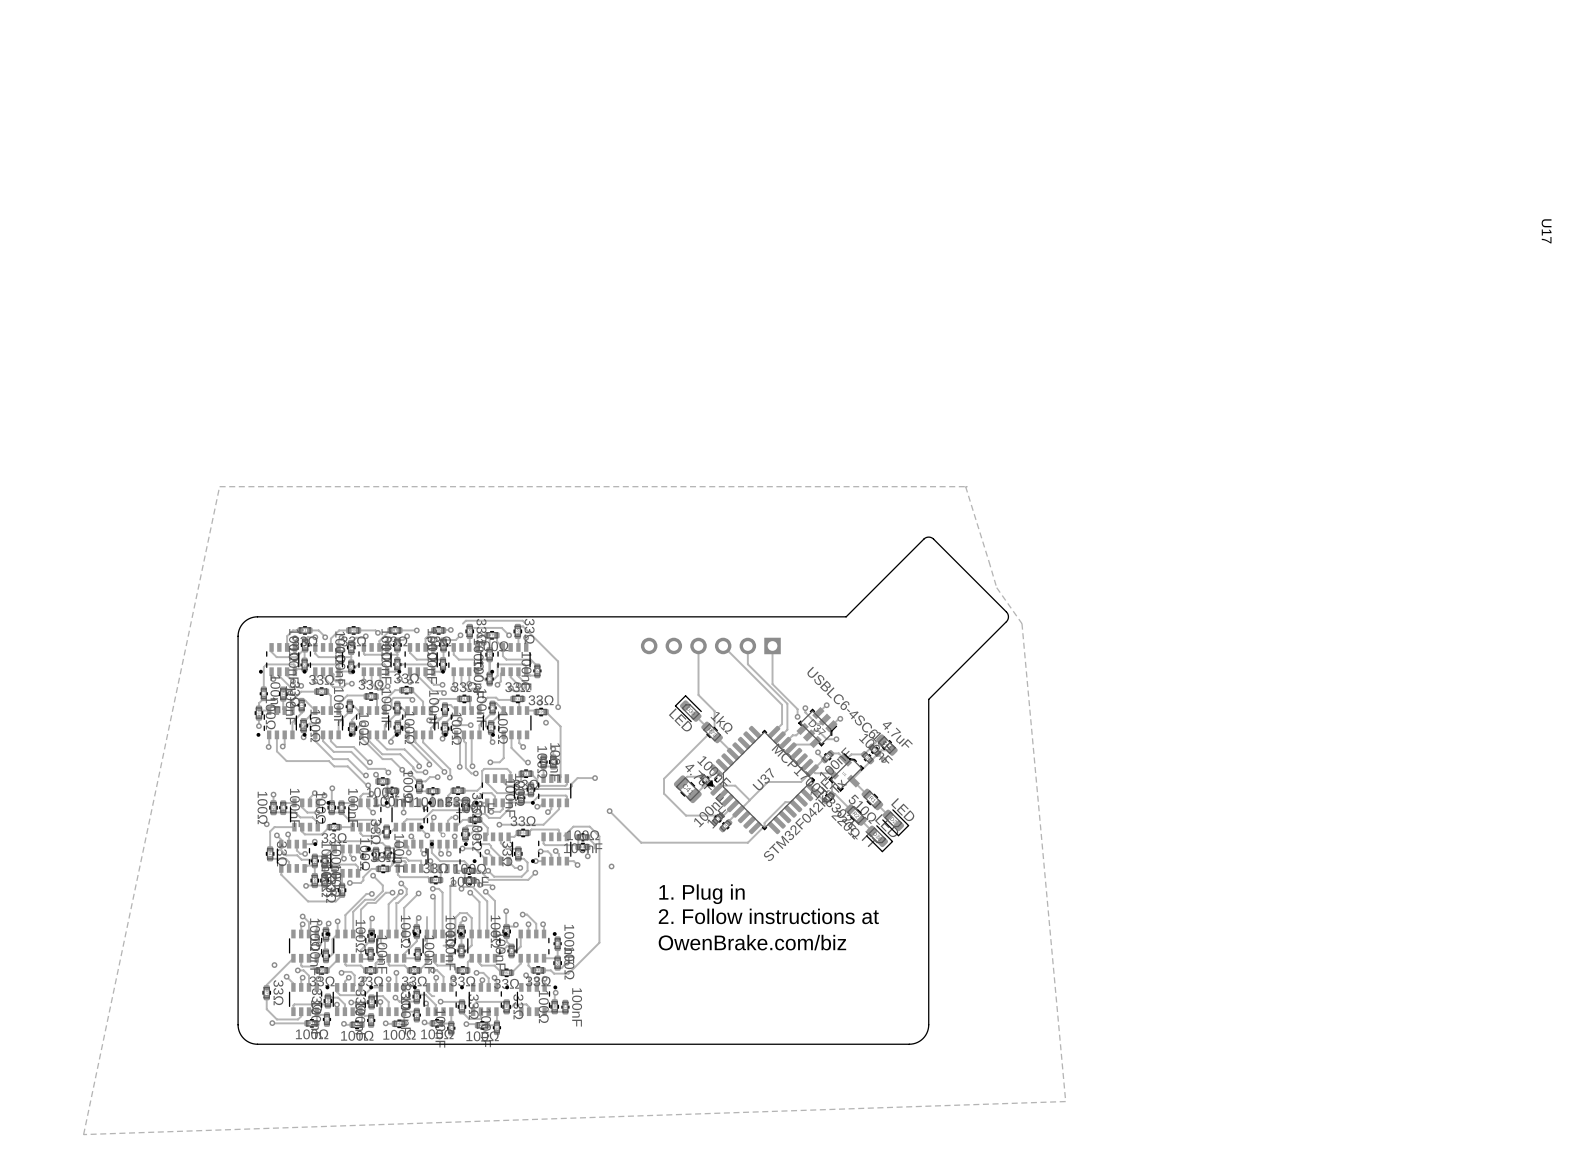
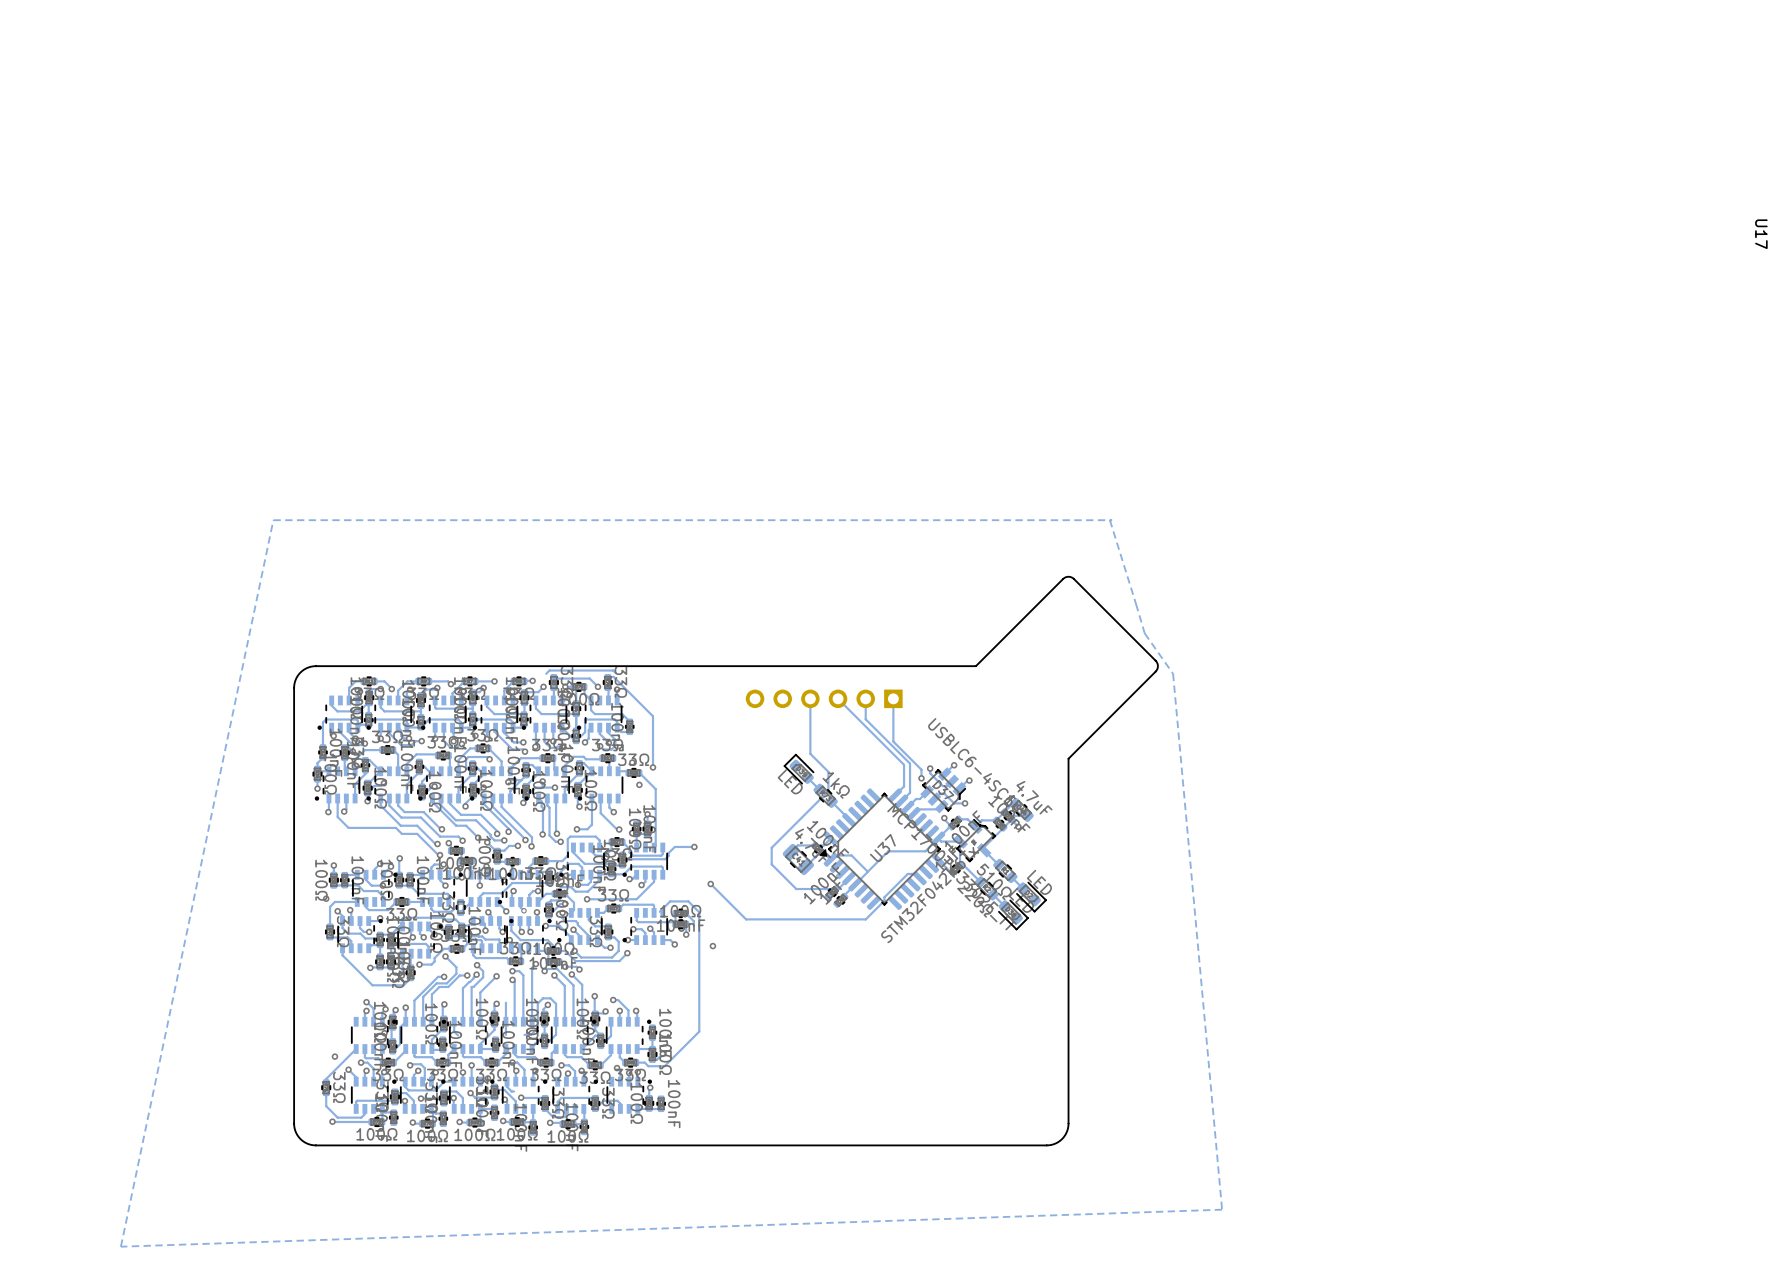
text: 1. Plug in (701, 894) -> none
text: 2. Follow instructions at (768, 916) -> none
text: OwenBrake.com/biz (752, 942) -> none

